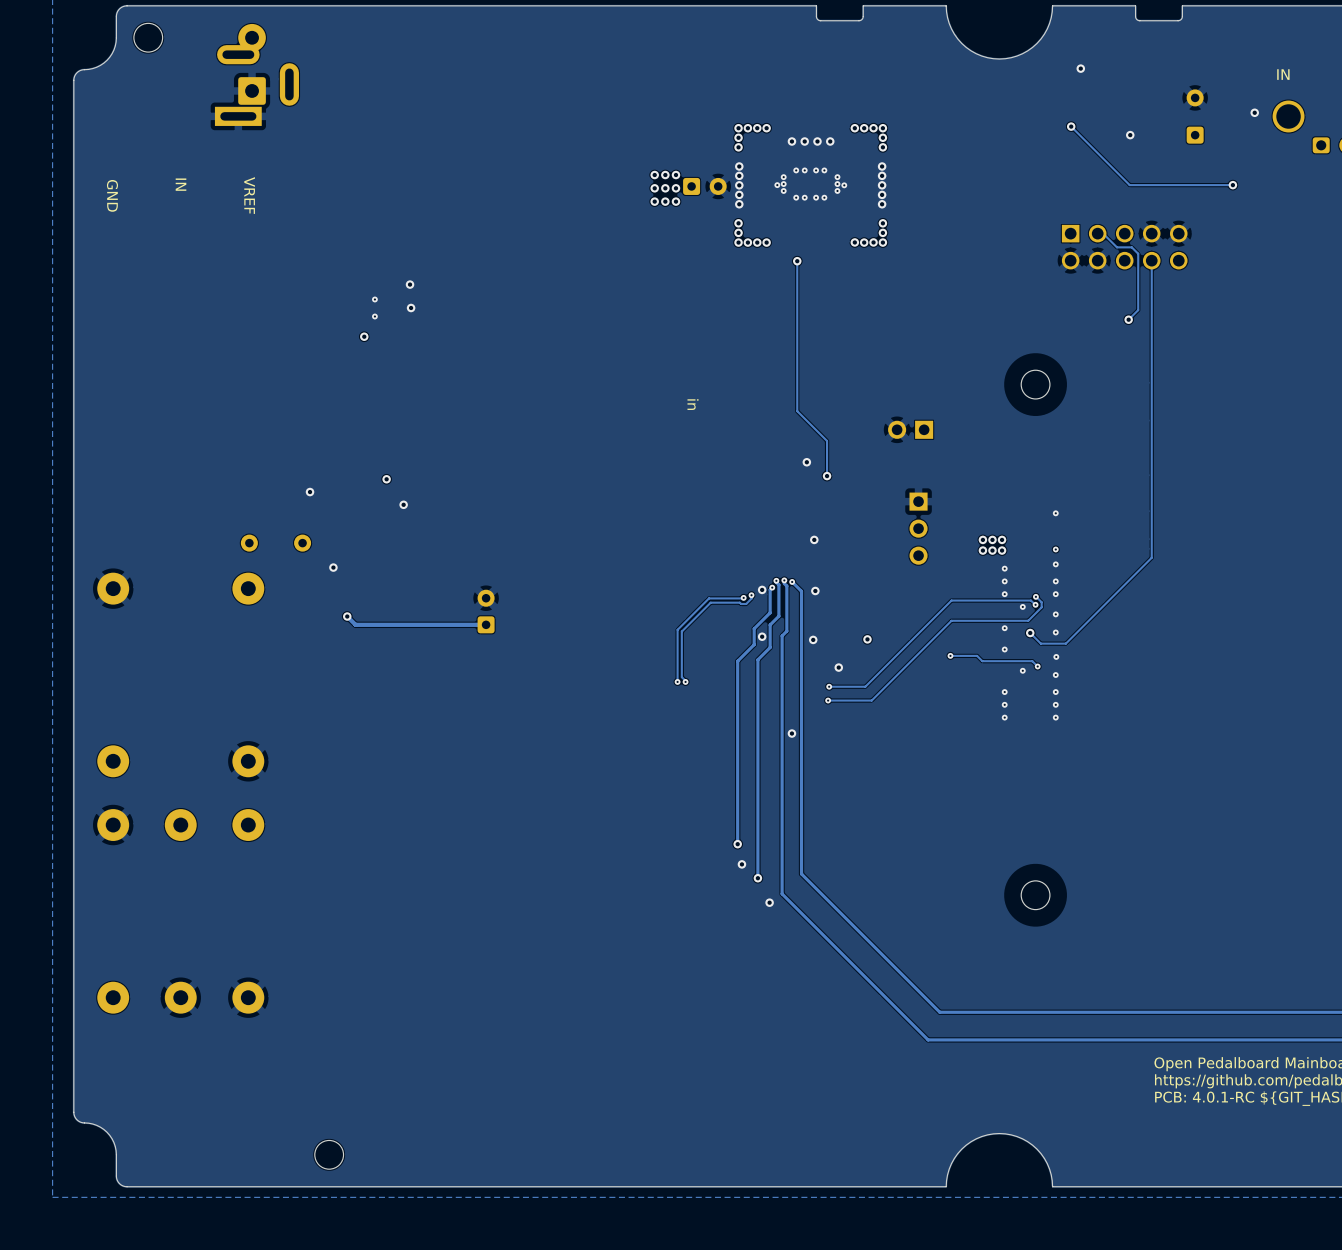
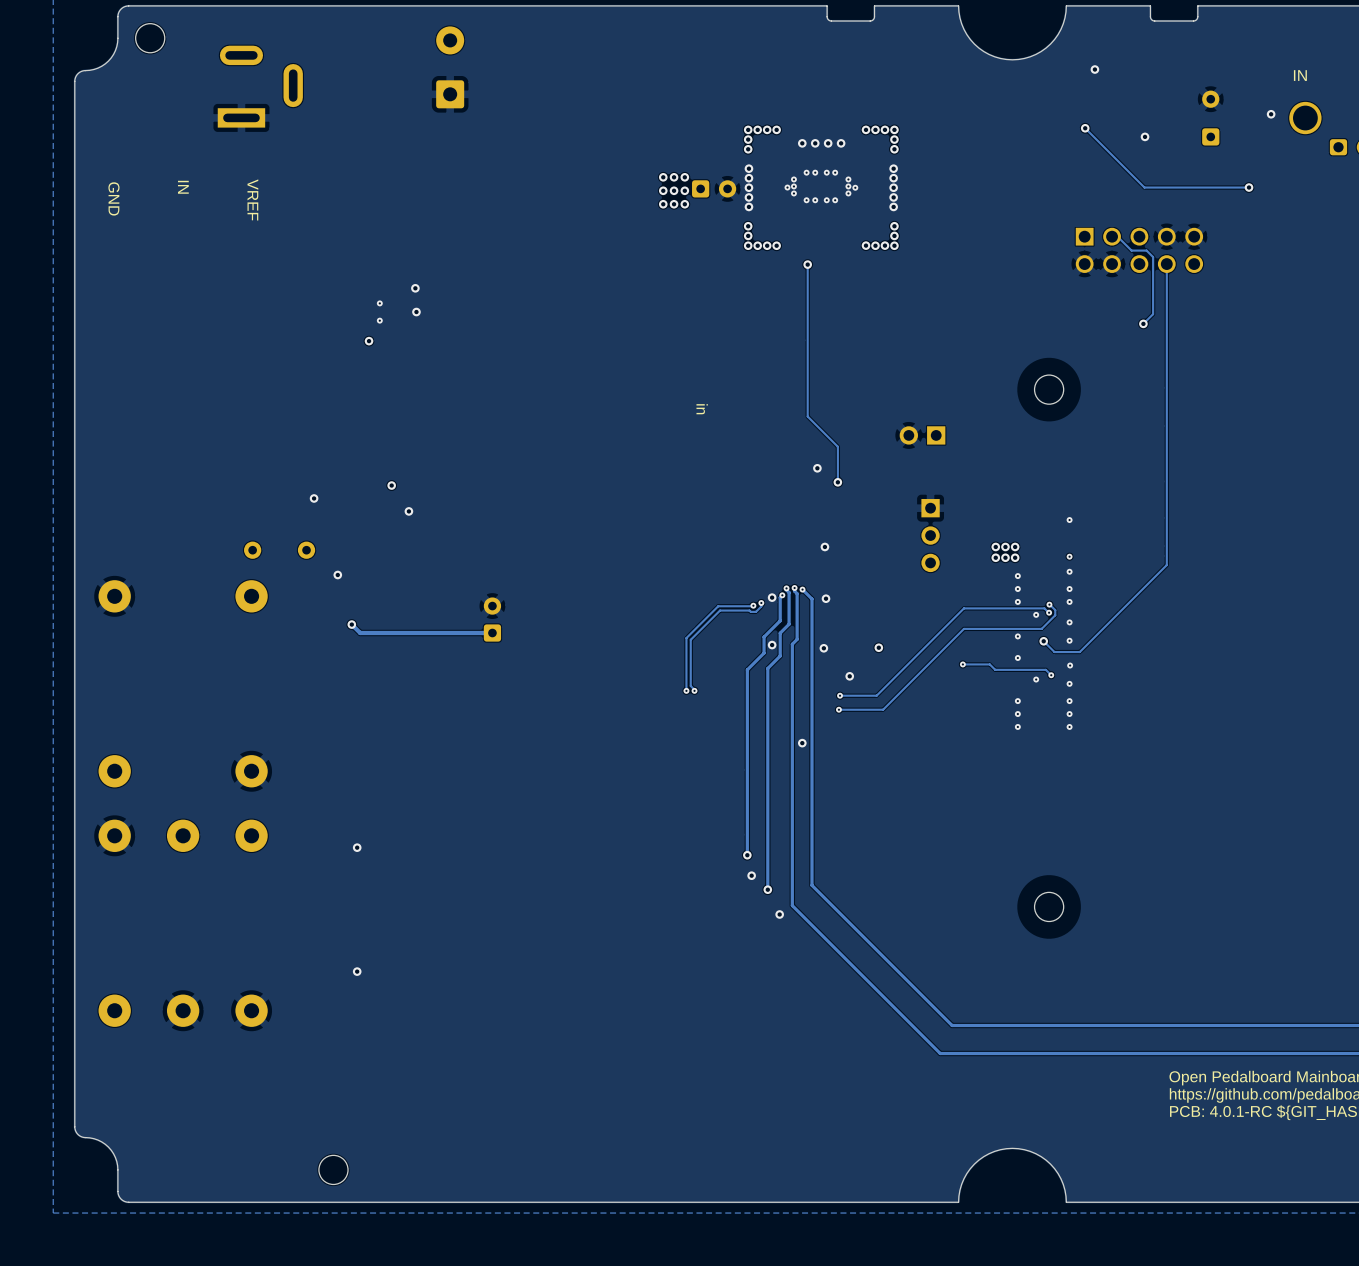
part position: (252, 64) -> (450, 67)
via: none -> (357, 847)
via: none -> (357, 971)

